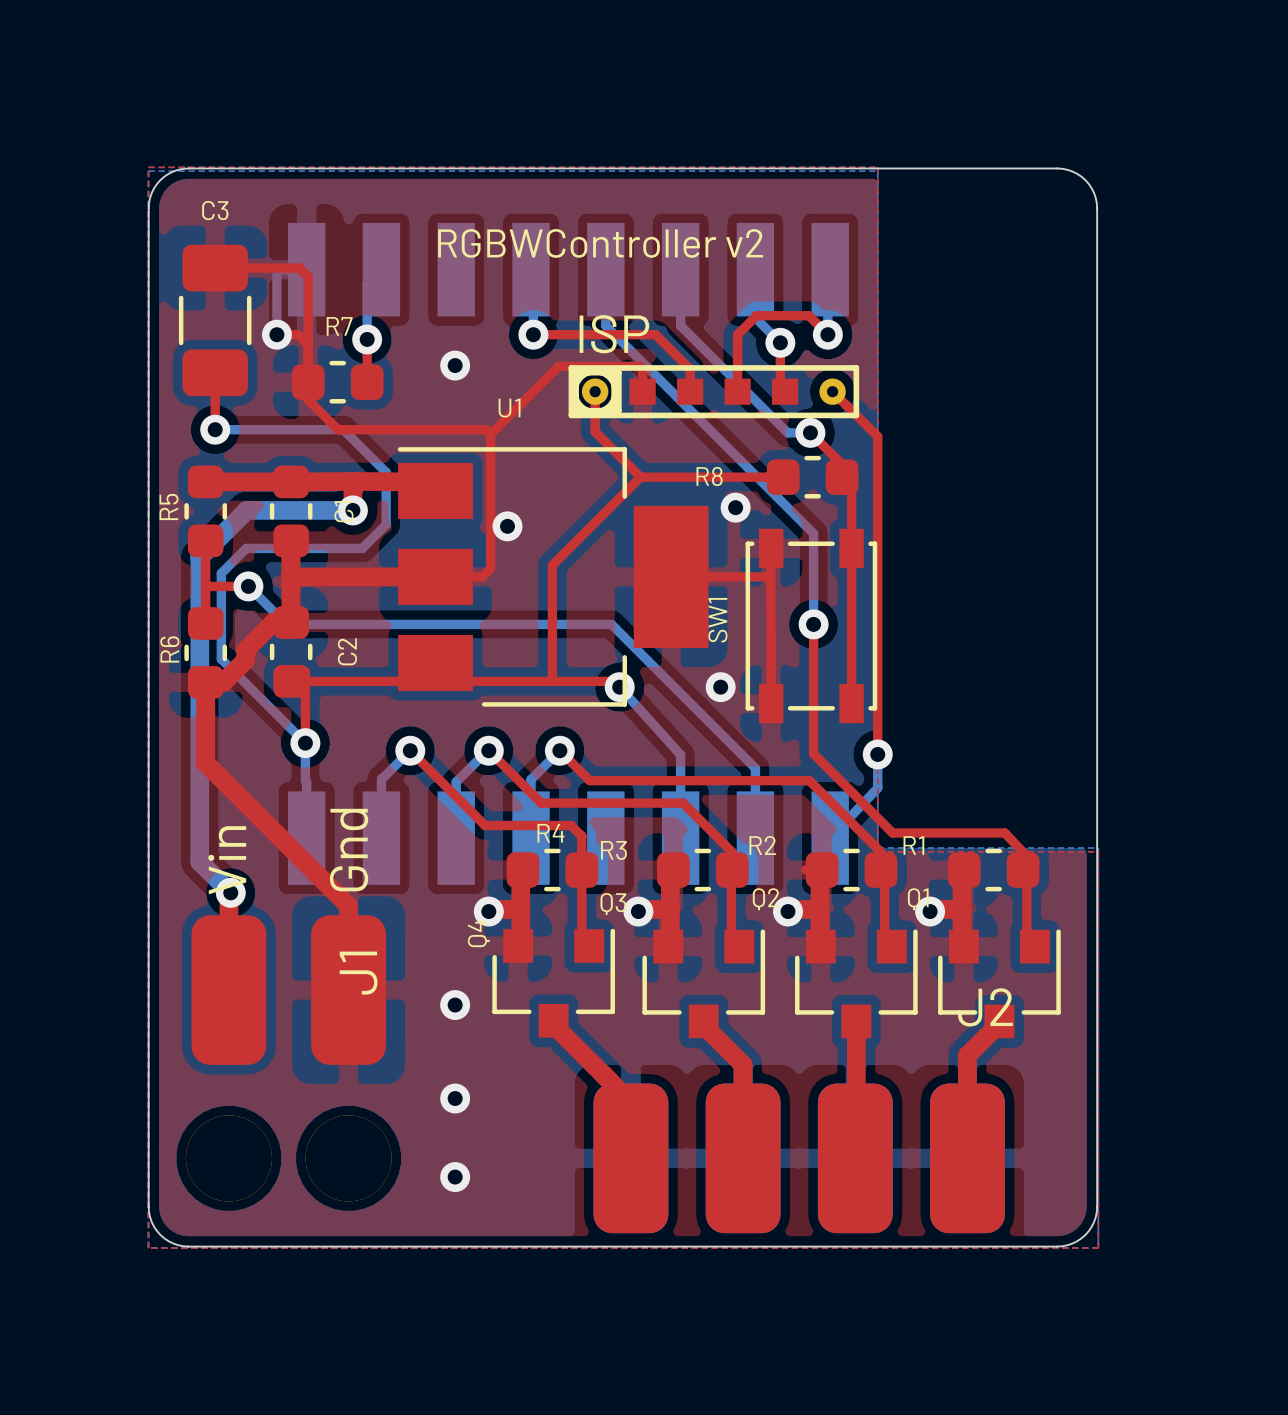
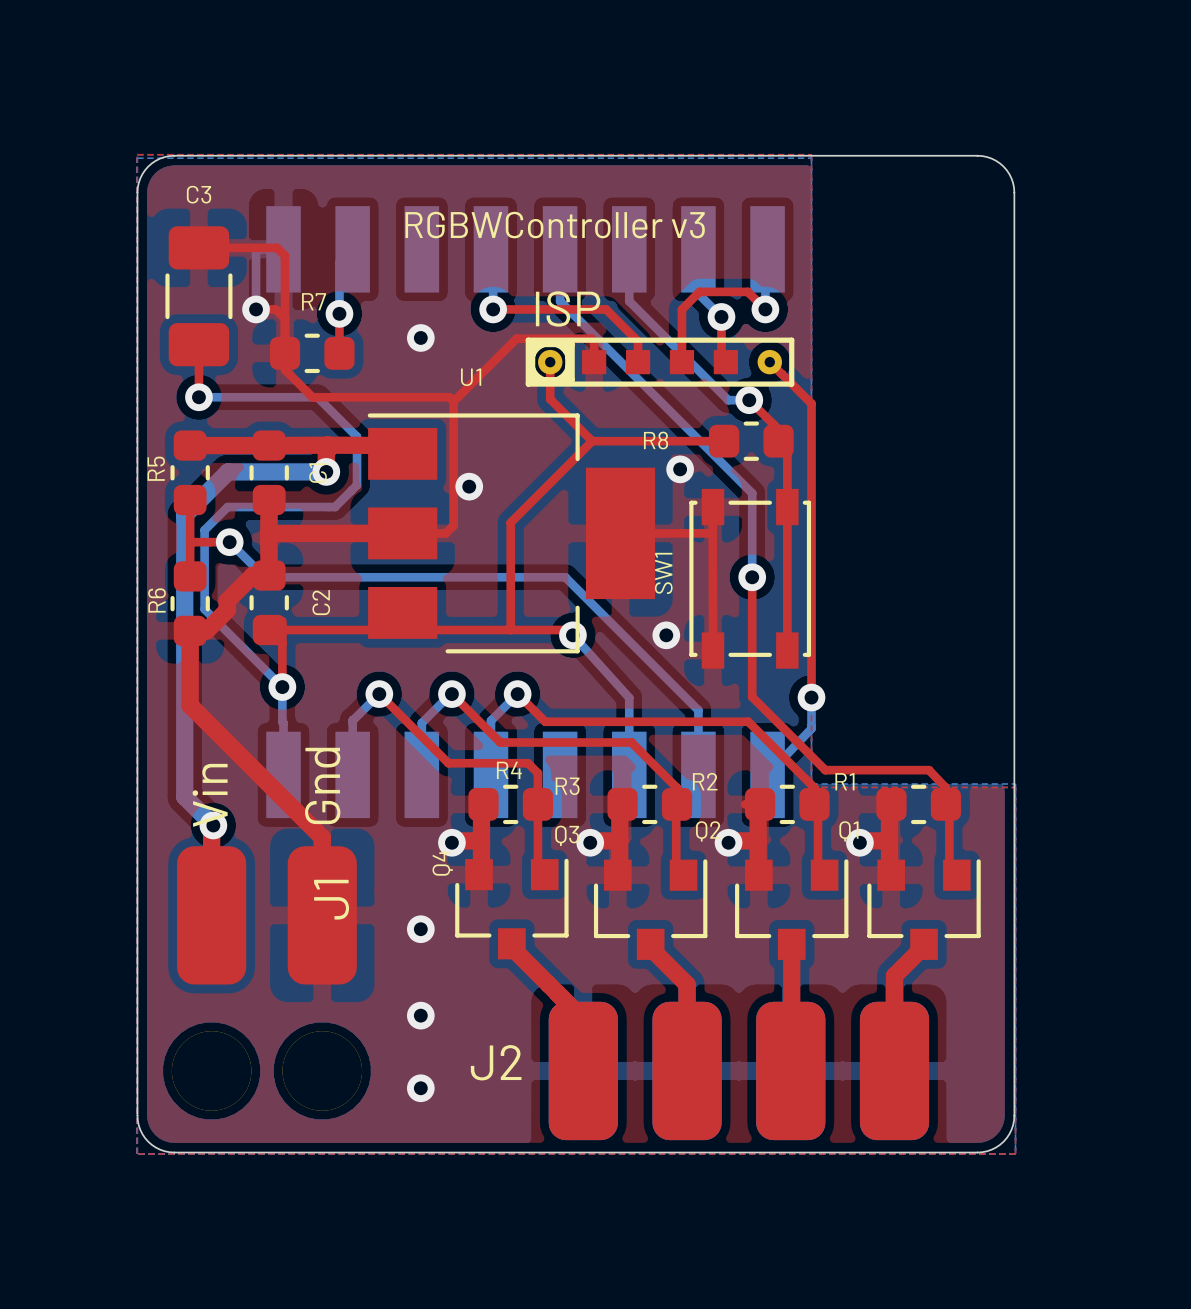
text: RGBWController v2 (600, 243) -> RGBWController v3 (555, 225)
J2 name position: J2 (985, 1007) -> J2 (496, 1062)

